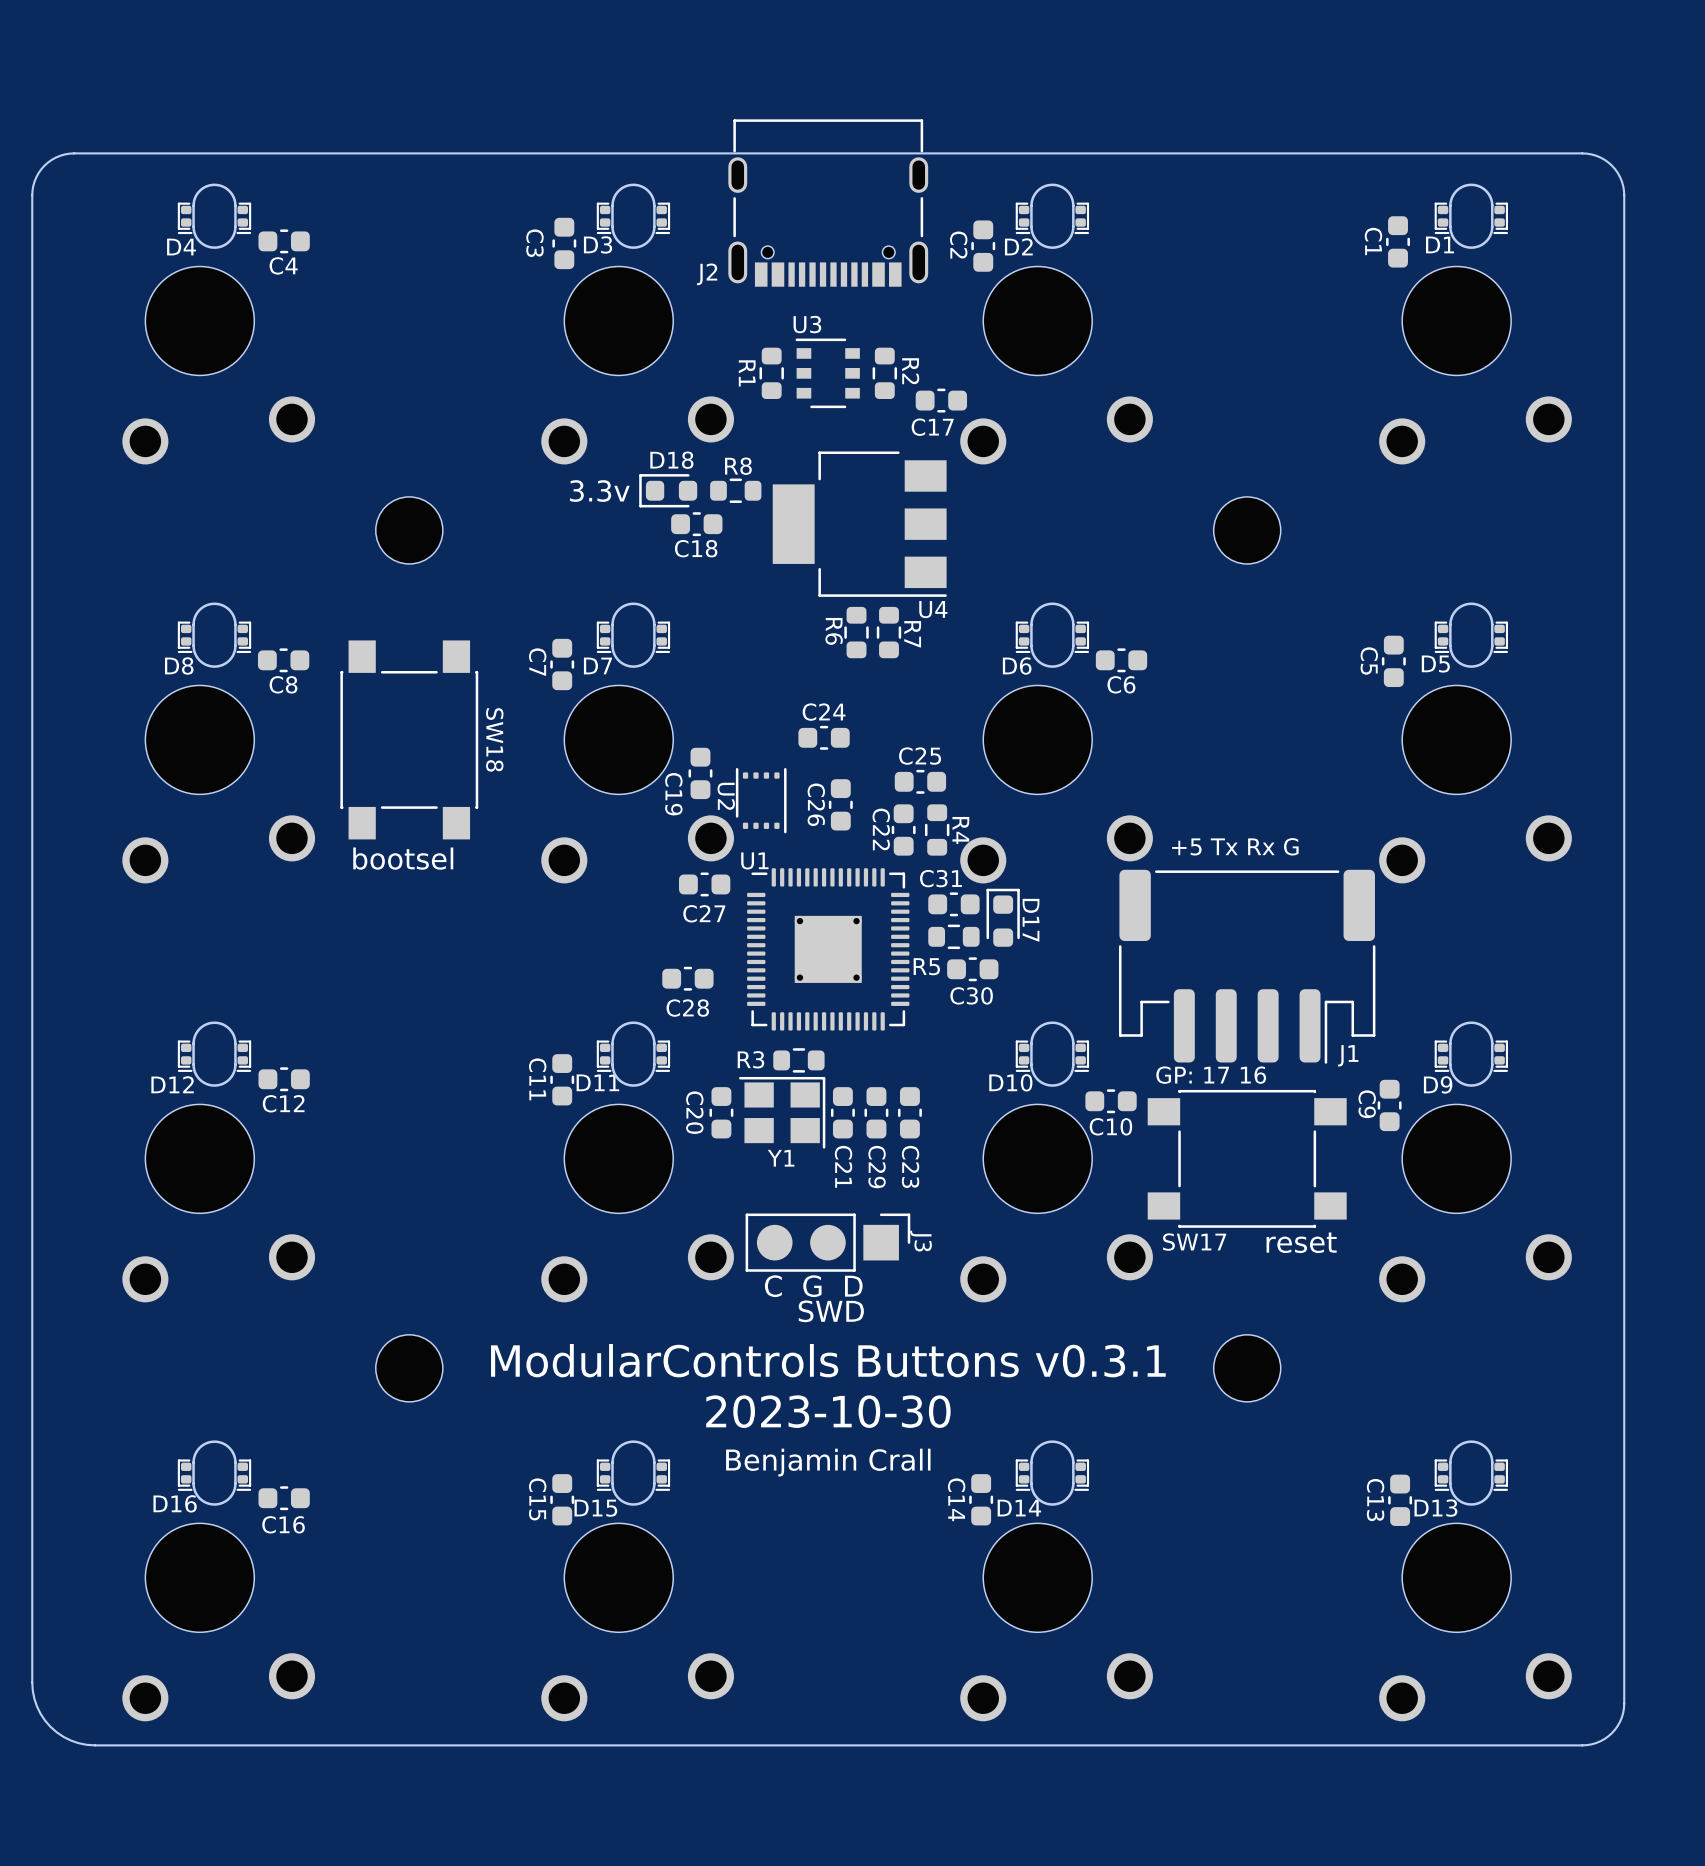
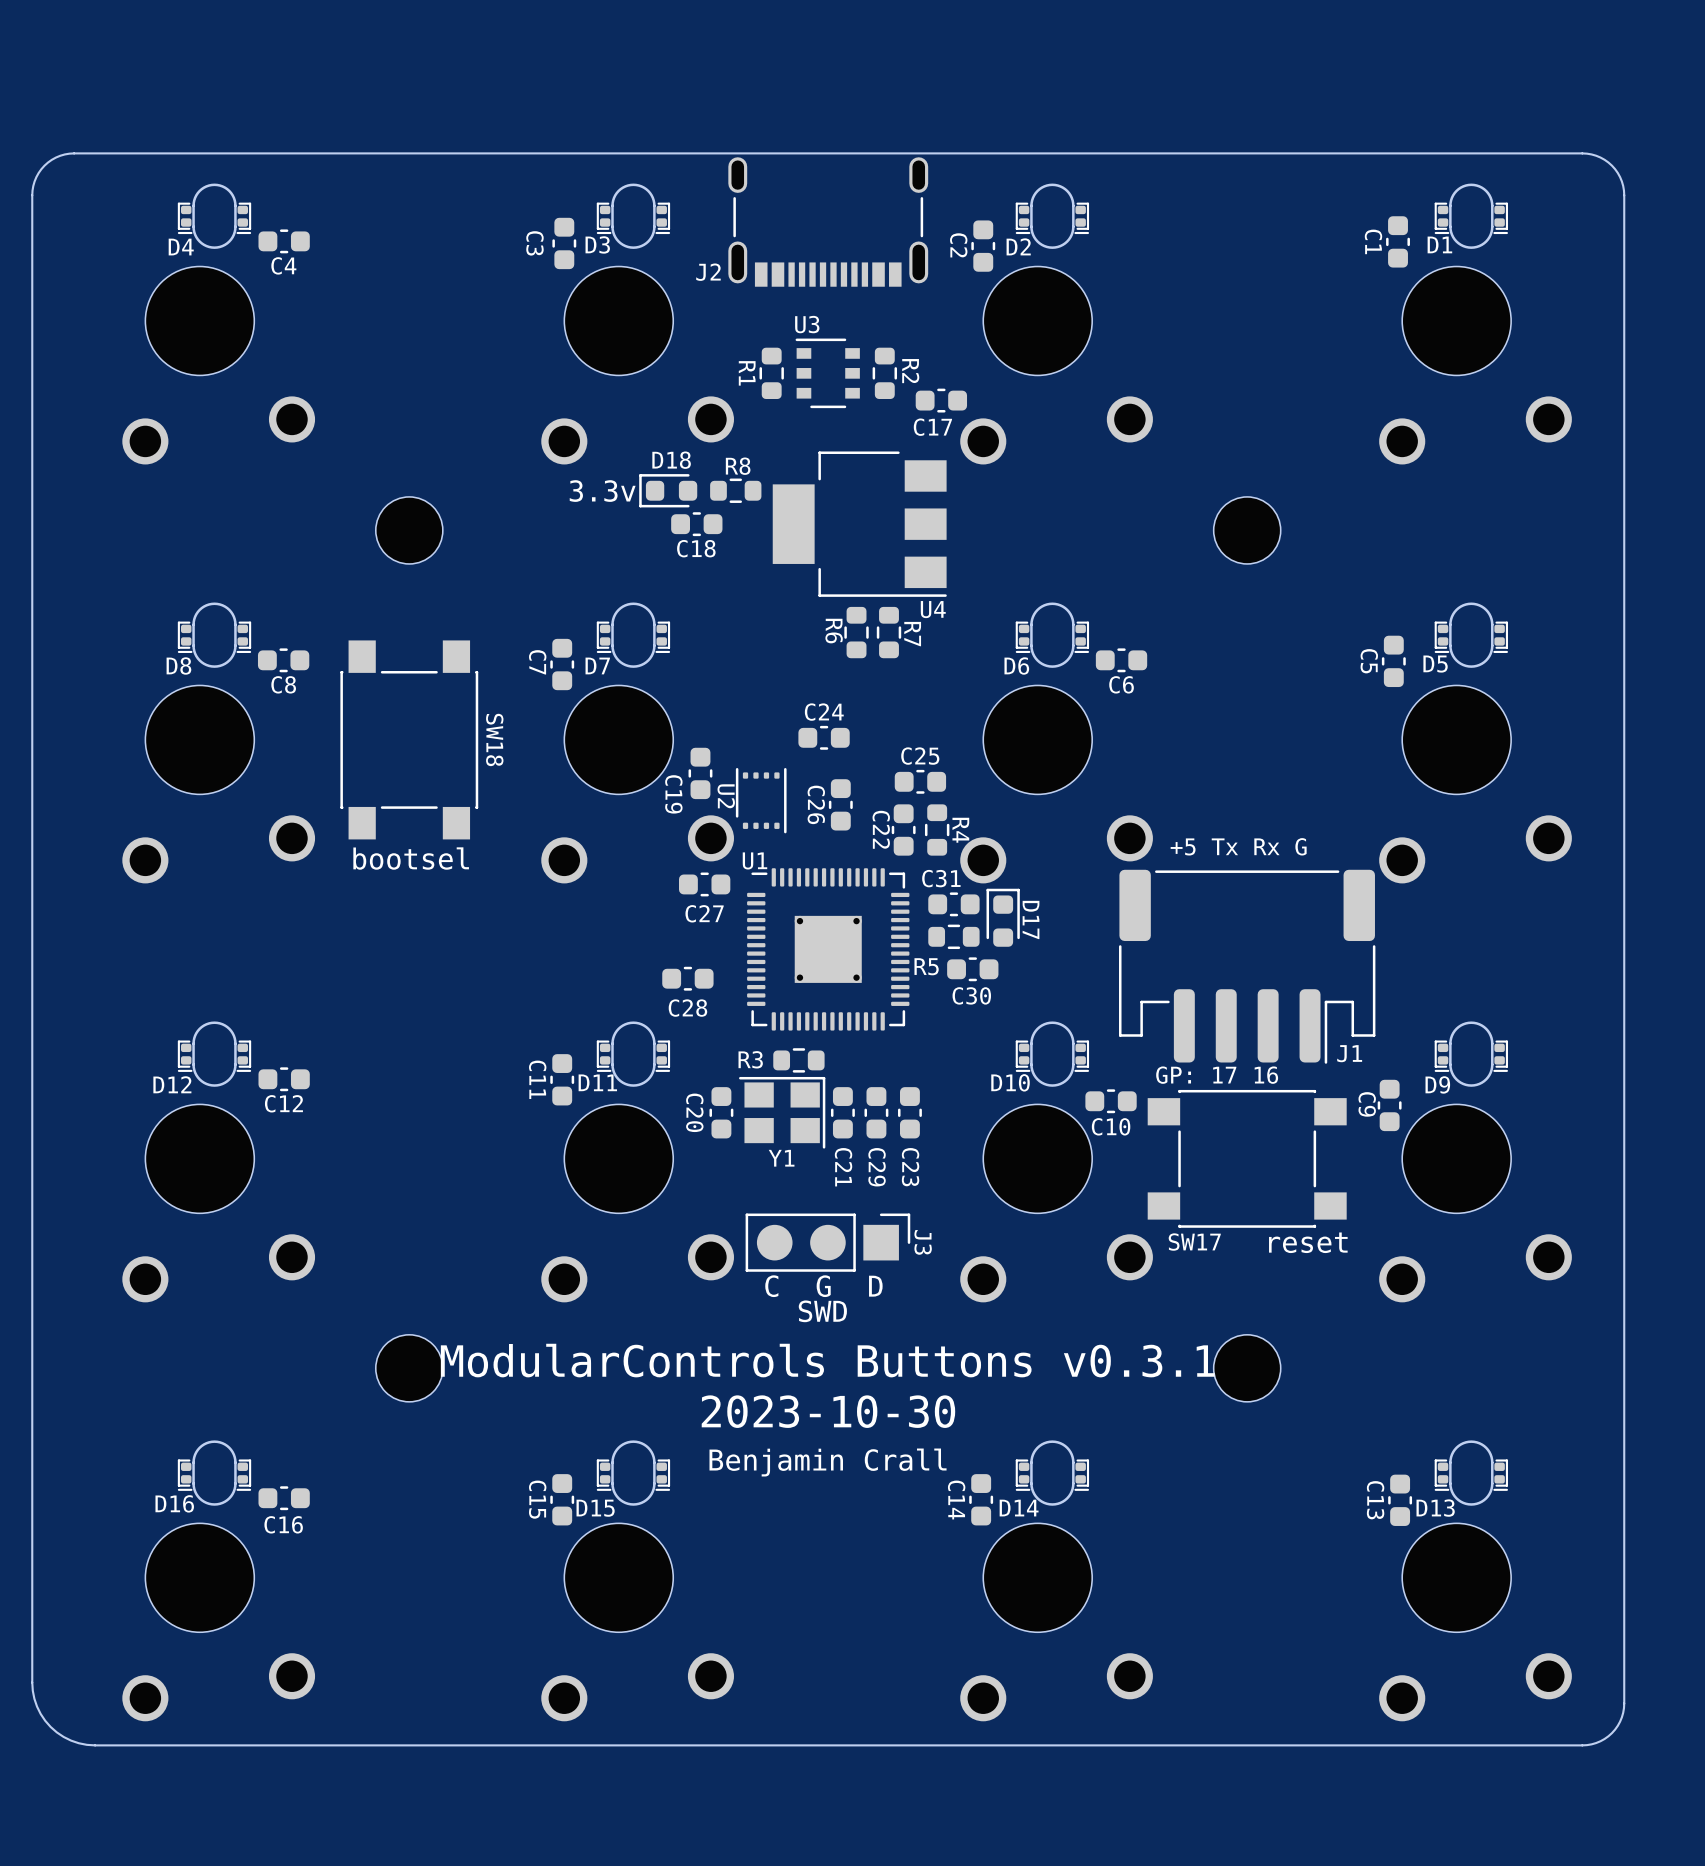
J2 footprint: [728, 119, 929, 287] -> [728, 157, 929, 287]

